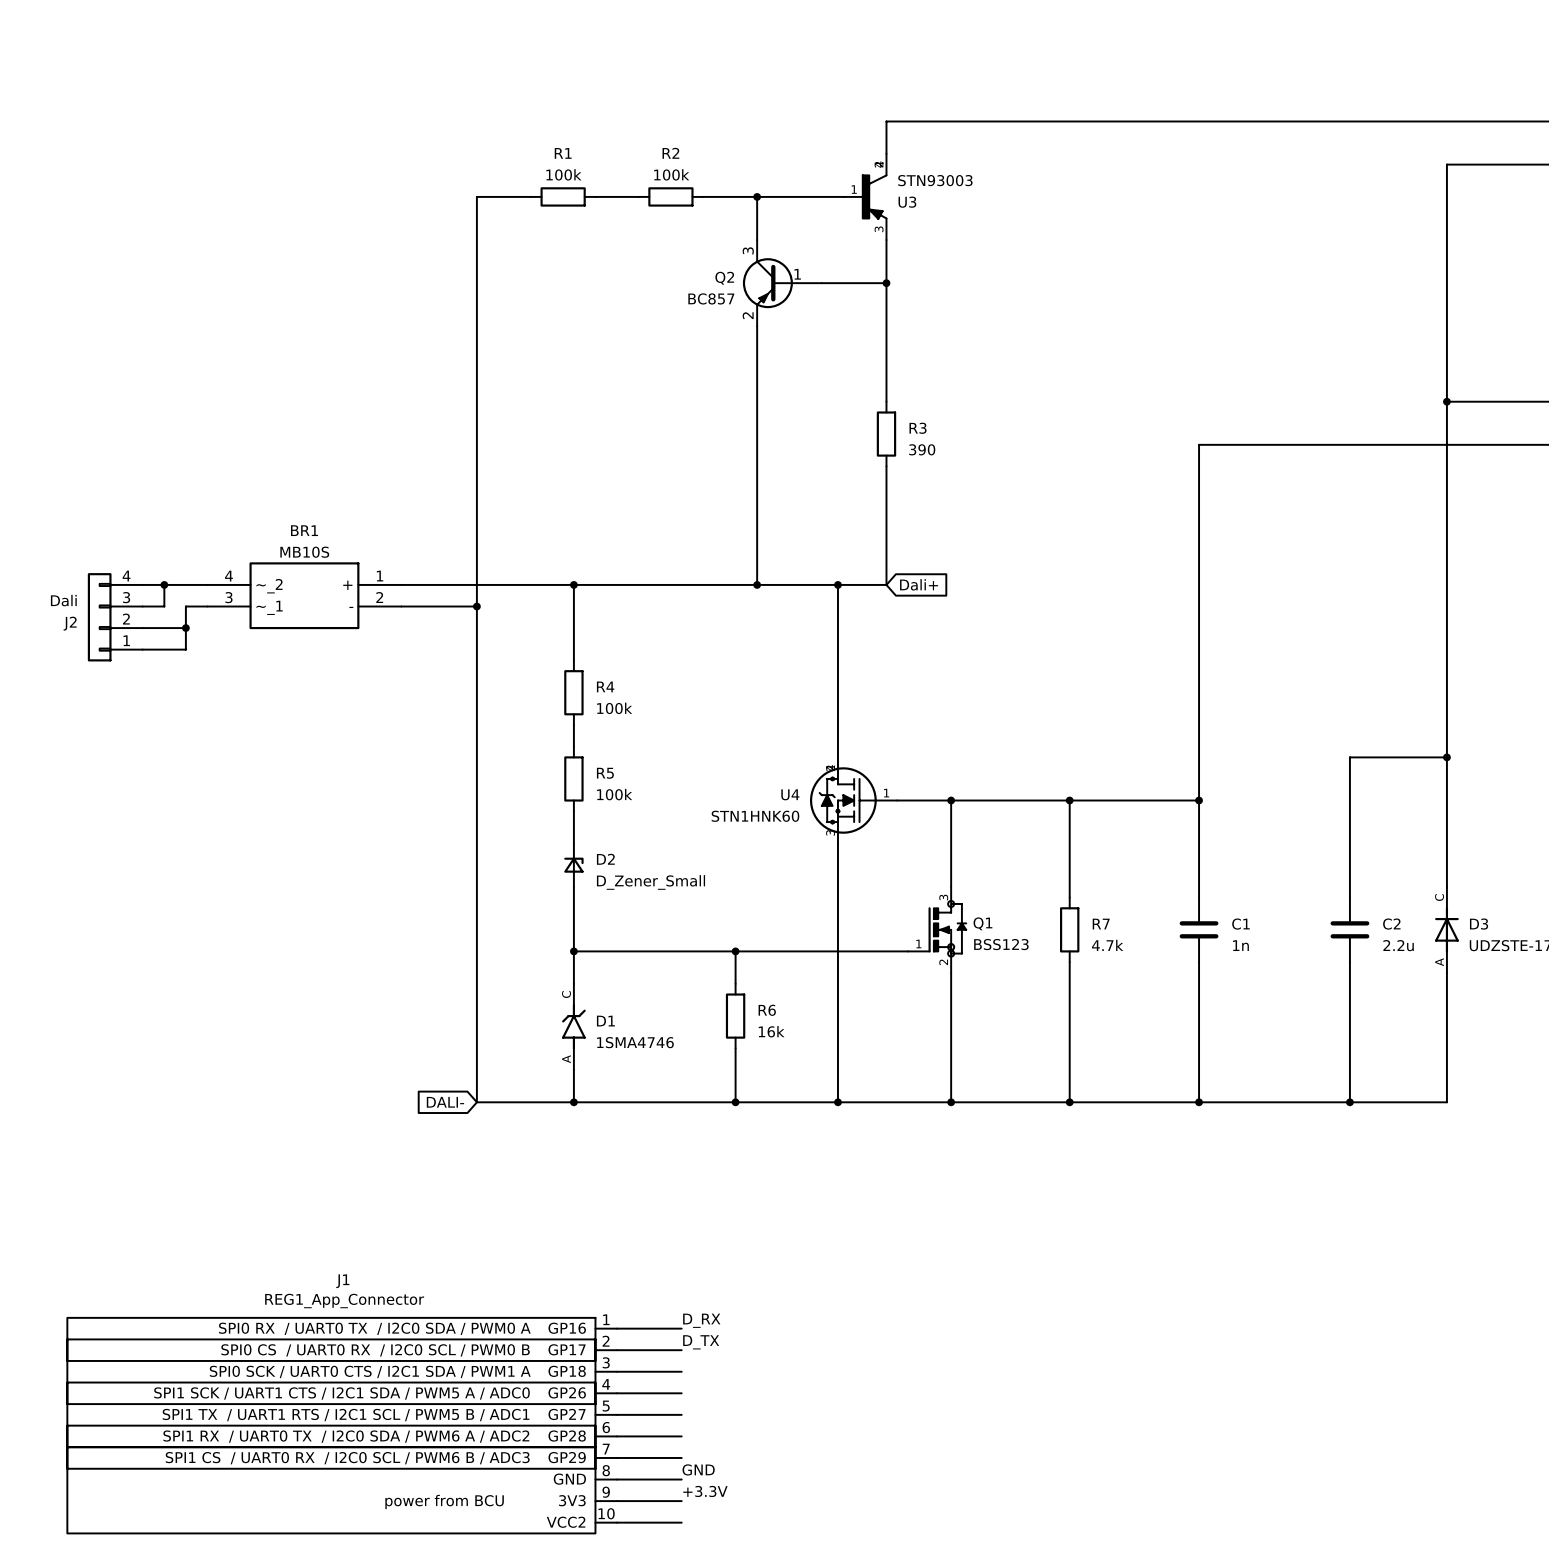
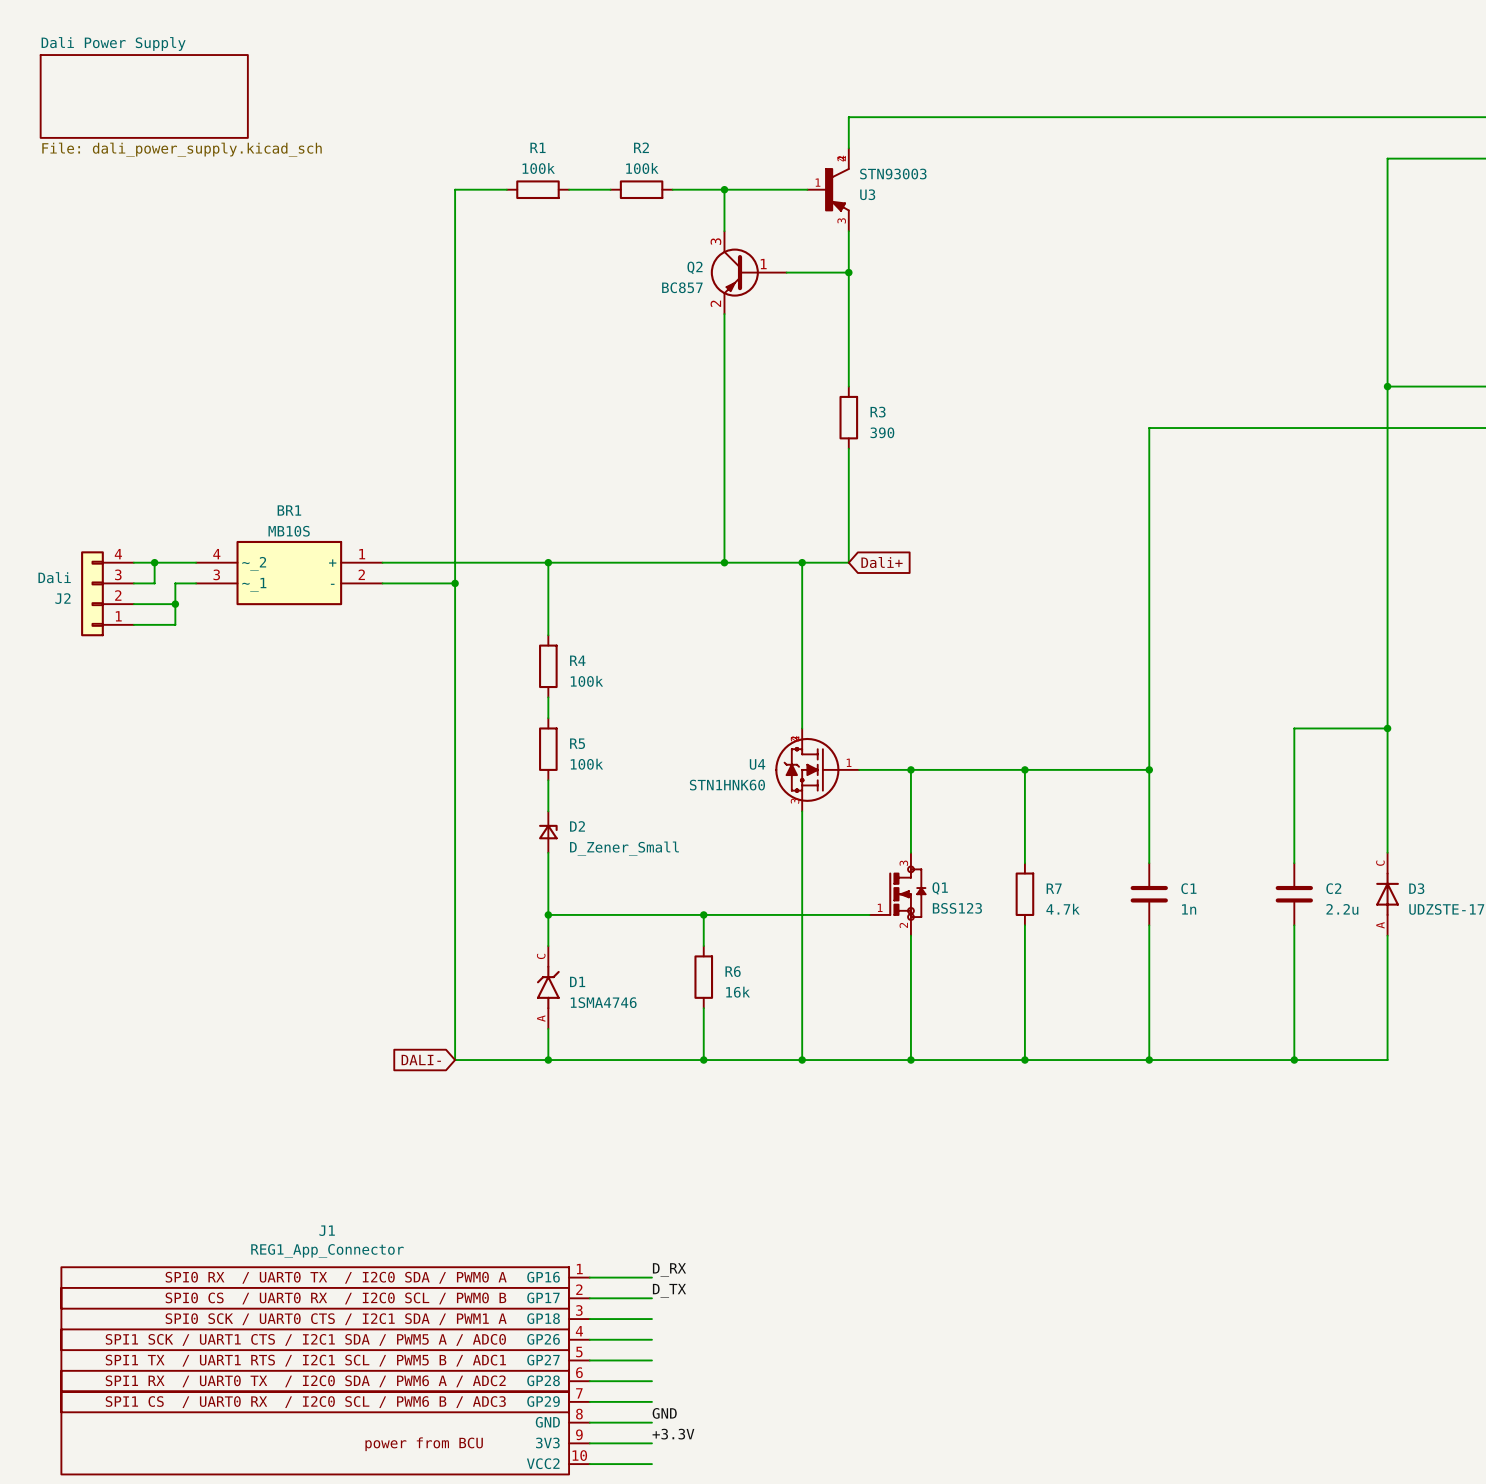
sheet Dali Power Supply: none -> File: dali_power_supply.kicad_sch (144, 96)

